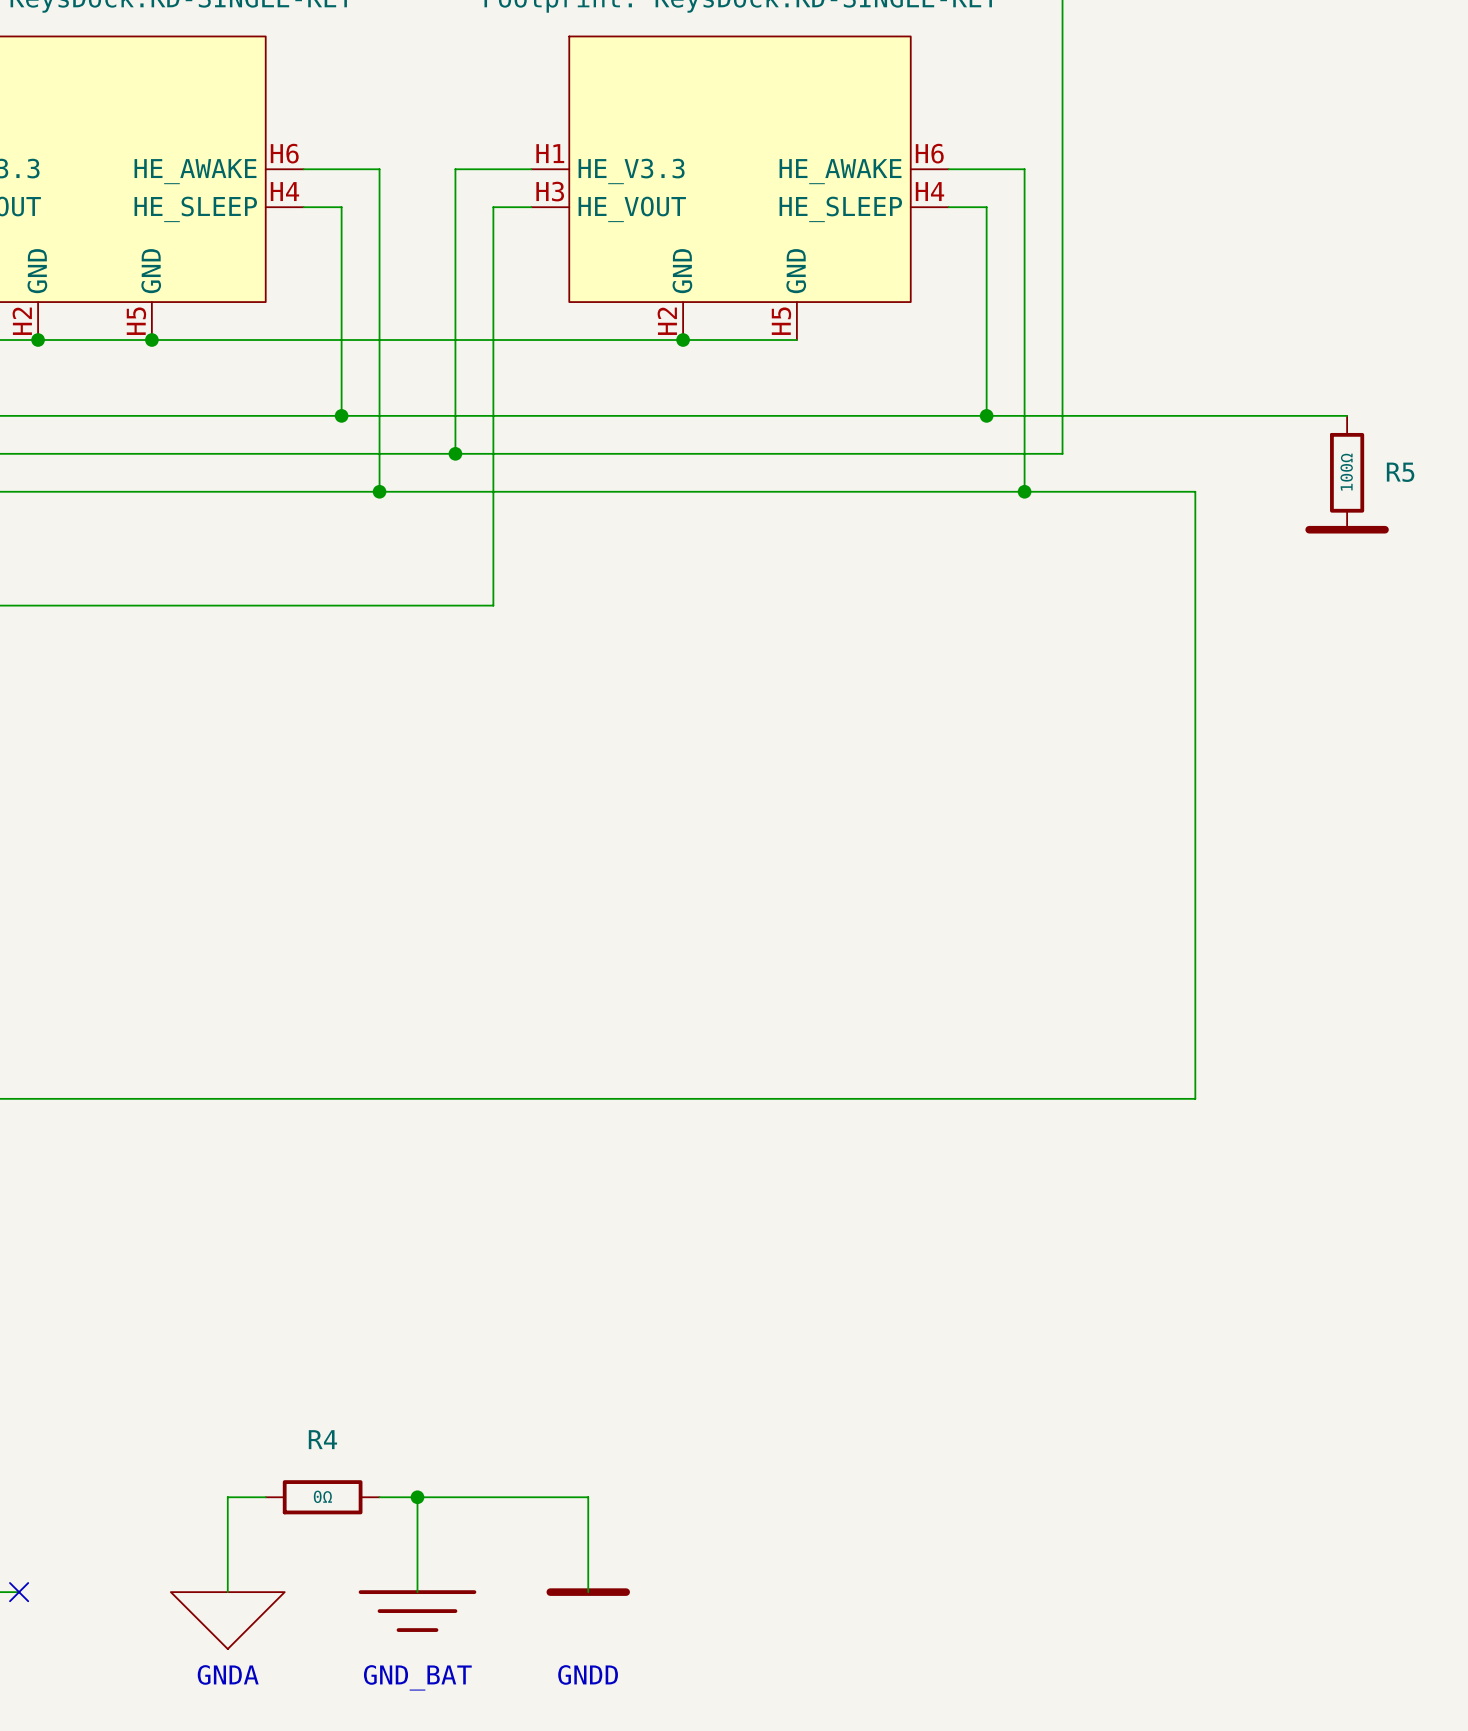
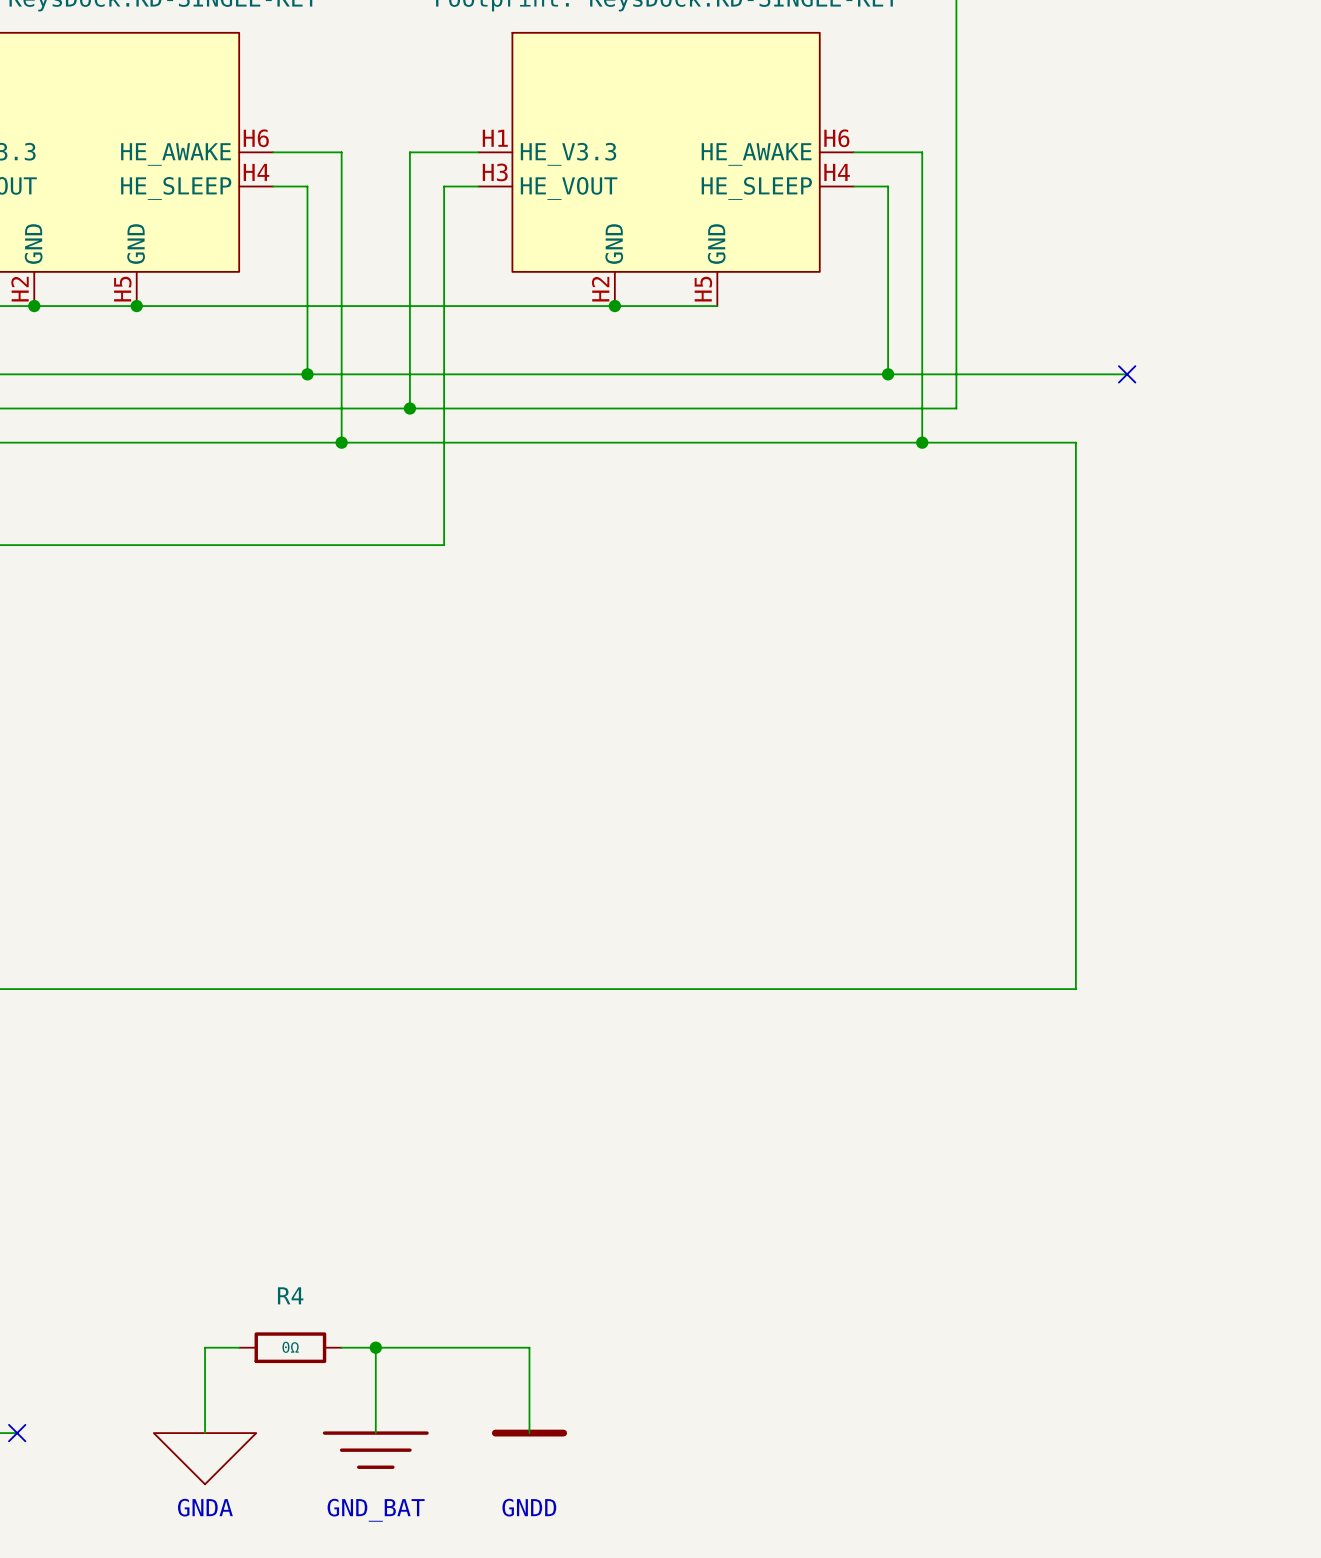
wire: (1252, 415) (1347, 415) -> none
no-connect mark: none -> (1127, 374)
R5: 100Ω (1347, 472) -> none
power symbol: (1347, 529) -> none

